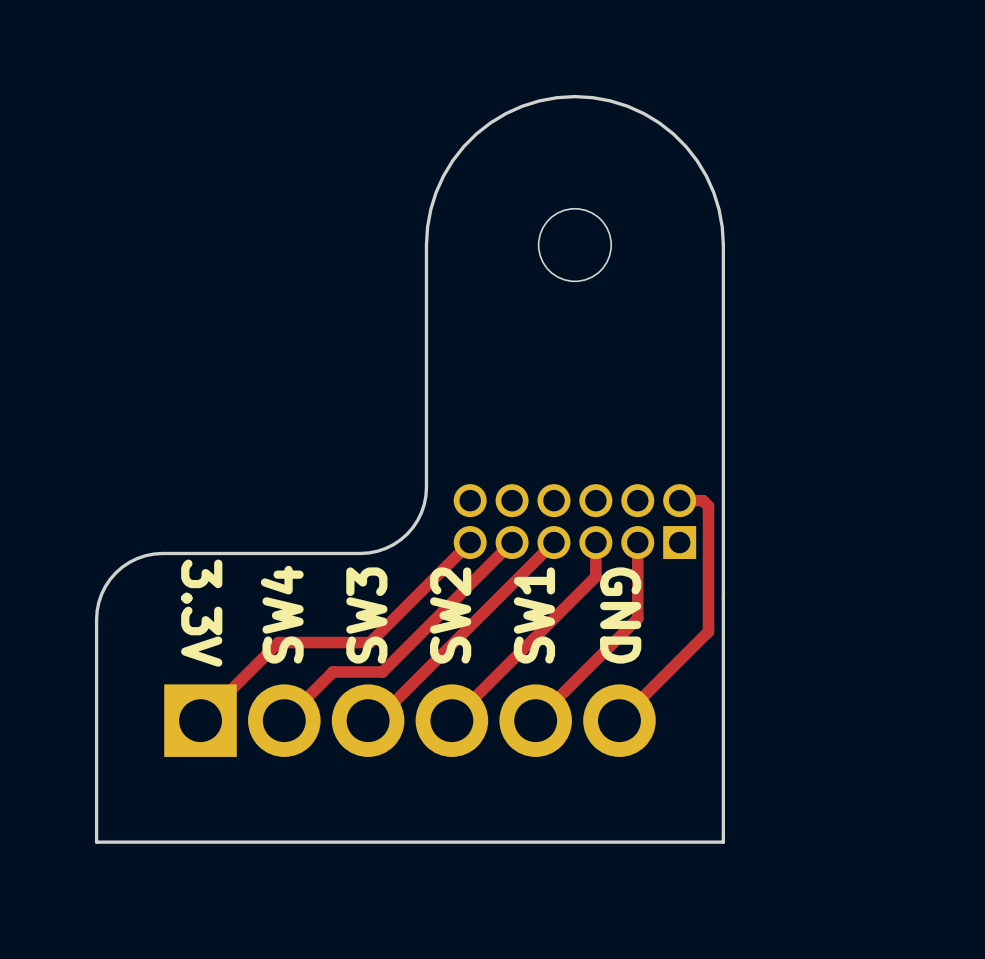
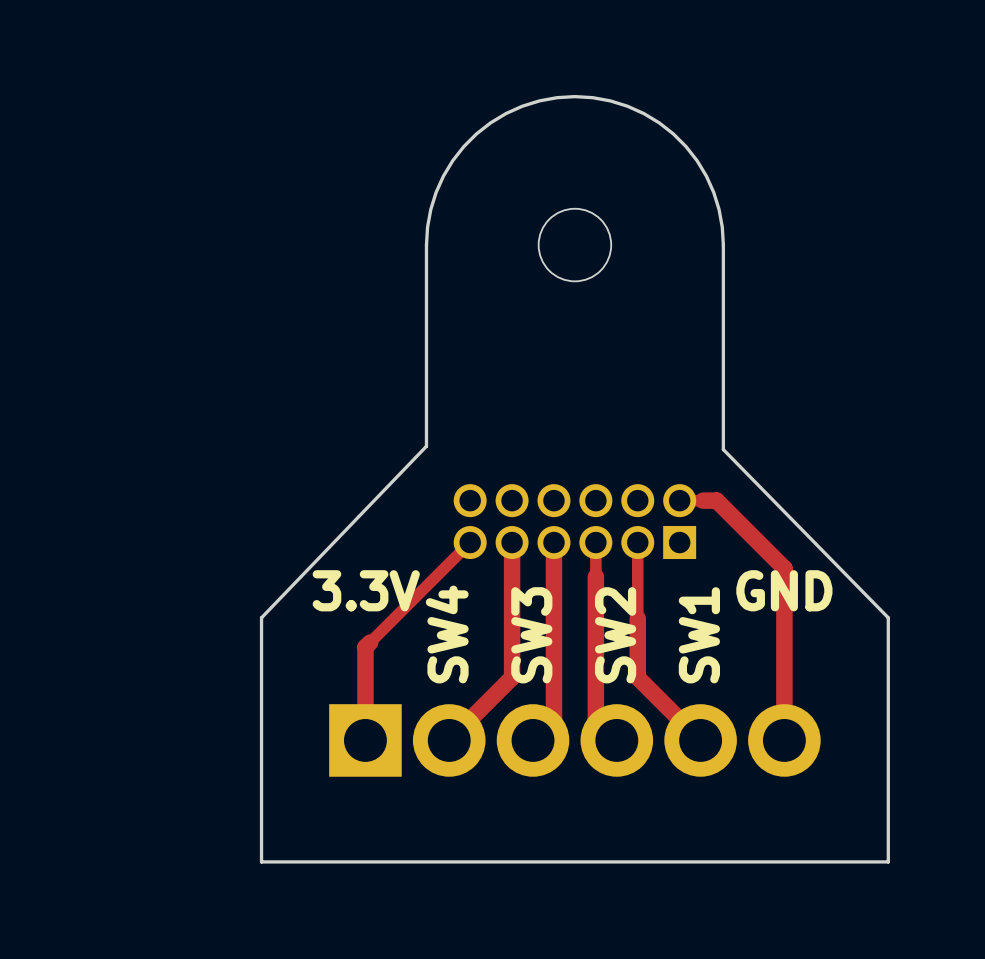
board edge: (426, 446) (425, 496) (421, 512) (407, 534) (385, 548) (360, 553) (153, 554) (129, 562) (110, 579) (101, 594) (96, 619) (96, 842) (723, 842) (723, 449) -> (426, 446) (261, 617) (261, 861) (888, 861) (888, 617) (723, 449)
top track: (702, 500) (708, 506) (708, 631) (619, 720) -> (702, 500) (716, 500) (784, 568) (784, 740)
top track: (512, 542) (382, 672) (332, 672) (284, 720) -> (512, 542) (512, 677) (449, 740)
top track: (553, 542) (375, 720) (368, 720) -> (553, 542) (553, 719) (533, 740)
top track: (595, 576) (451, 720) -> (595, 576) (595, 719) (616, 740)
text rotation: 0° (201, 613) -> 90° counterclockwise (366, 590)
text position: 3.3V (201, 613) -> 3.3V (366, 590)
text position: SW4 (282, 614) -> SW4 (447, 634)
text position: SW3 (366, 615) -> SW3 (531, 635)
text position: SW2 (450, 615) -> SW2 (615, 635)
text position: SW1 (534, 615) -> SW1 (699, 635)
text rotation: 0° (620, 615) -> 90° counterclockwise (784, 590)
text position: GND (620, 615) -> GND (784, 590)
top track: (637, 618) (535, 720) -> (637, 618) (637, 677) (700, 740)
top track: (370, 642) (278, 642) (200, 720) -> (370, 642) (365, 647) (365, 740)
part position: (409, 720) -> (574, 740)

